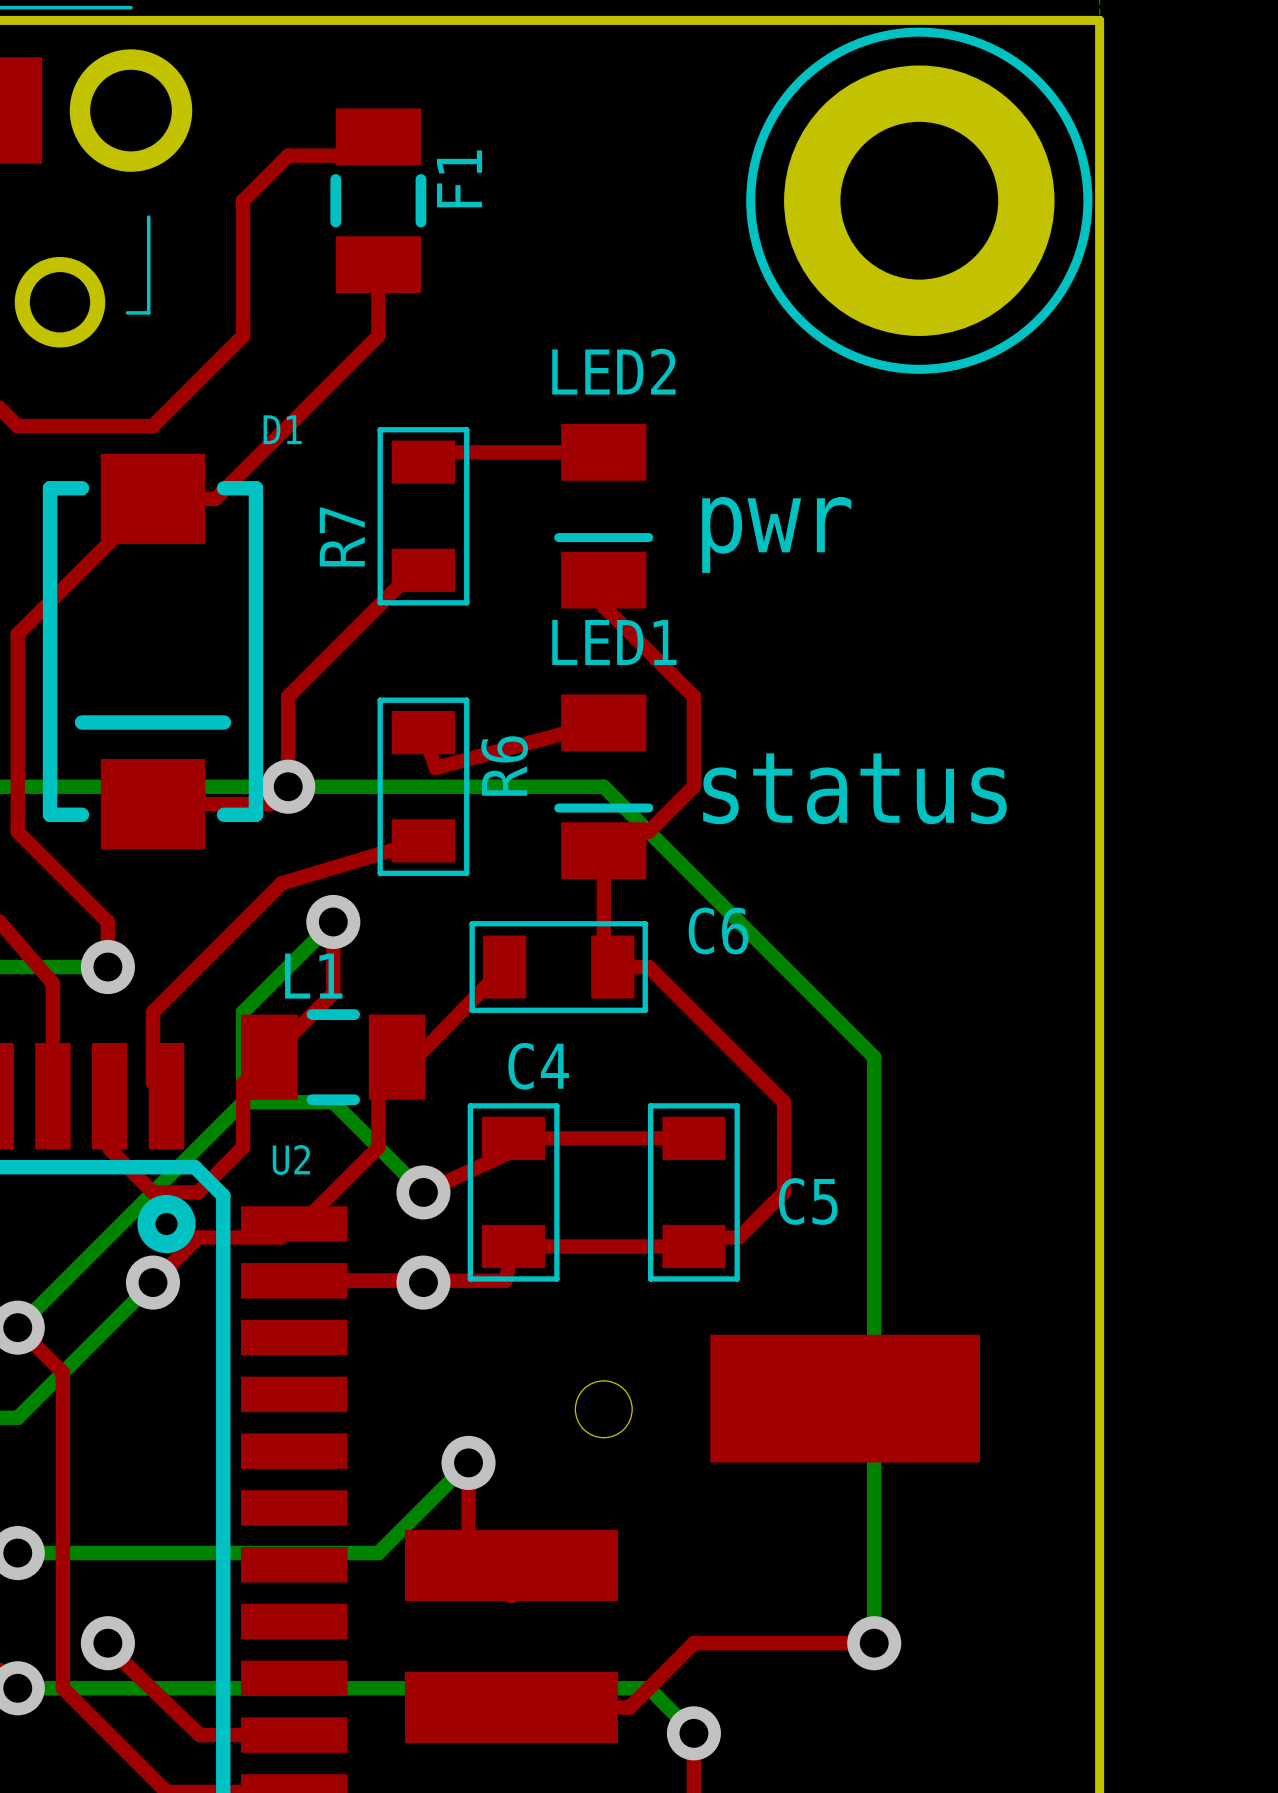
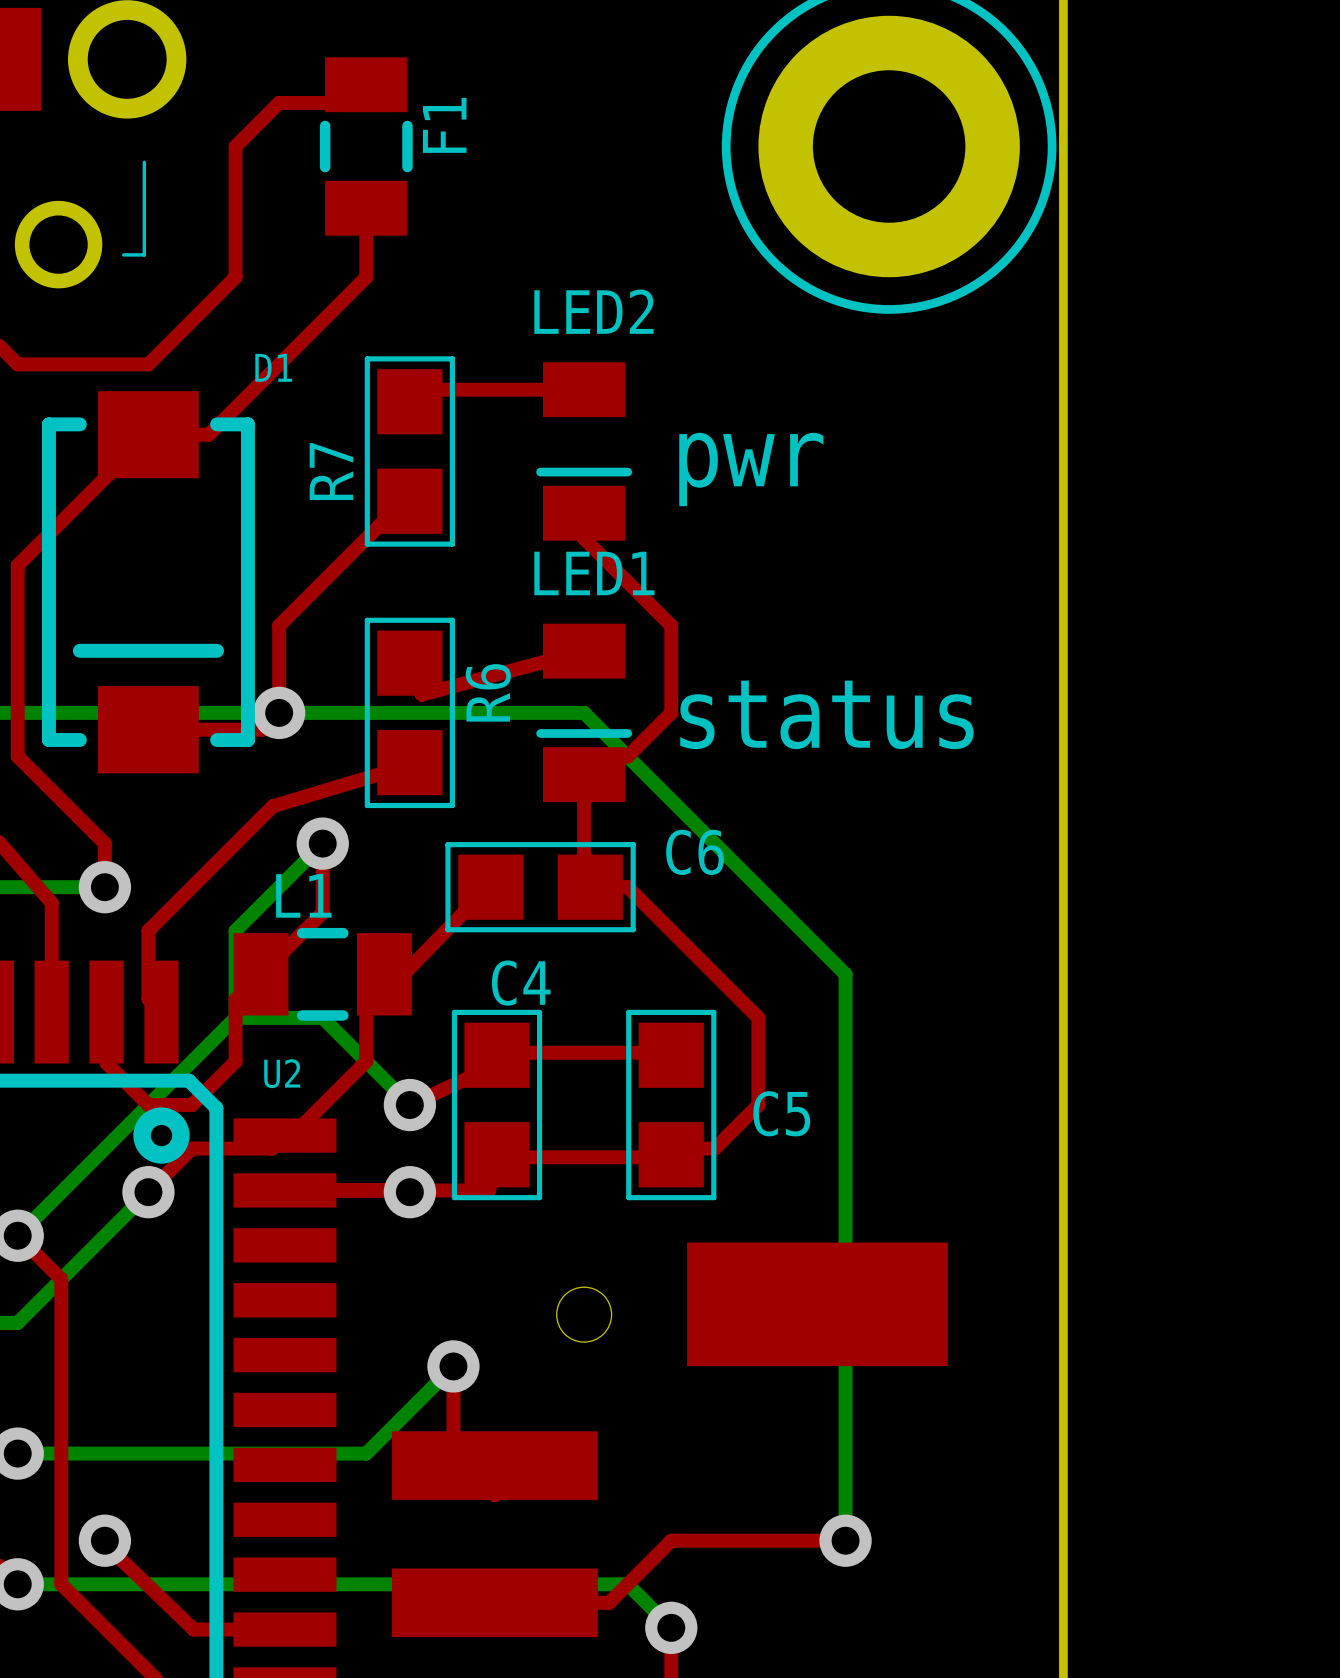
R7 footprint: [377, 427, 470, 606] -> [364, 356, 455, 547]
R6 footprint: [377, 697, 470, 876] -> [364, 617, 455, 809]
C6 footprint: [469, 921, 648, 1013] -> [445, 842, 636, 933]
C4 footprint: [467, 1103, 560, 1282] -> [451, 1009, 543, 1201]
C5 footprint: [647, 1103, 740, 1282] -> [626, 1009, 717, 1201]

